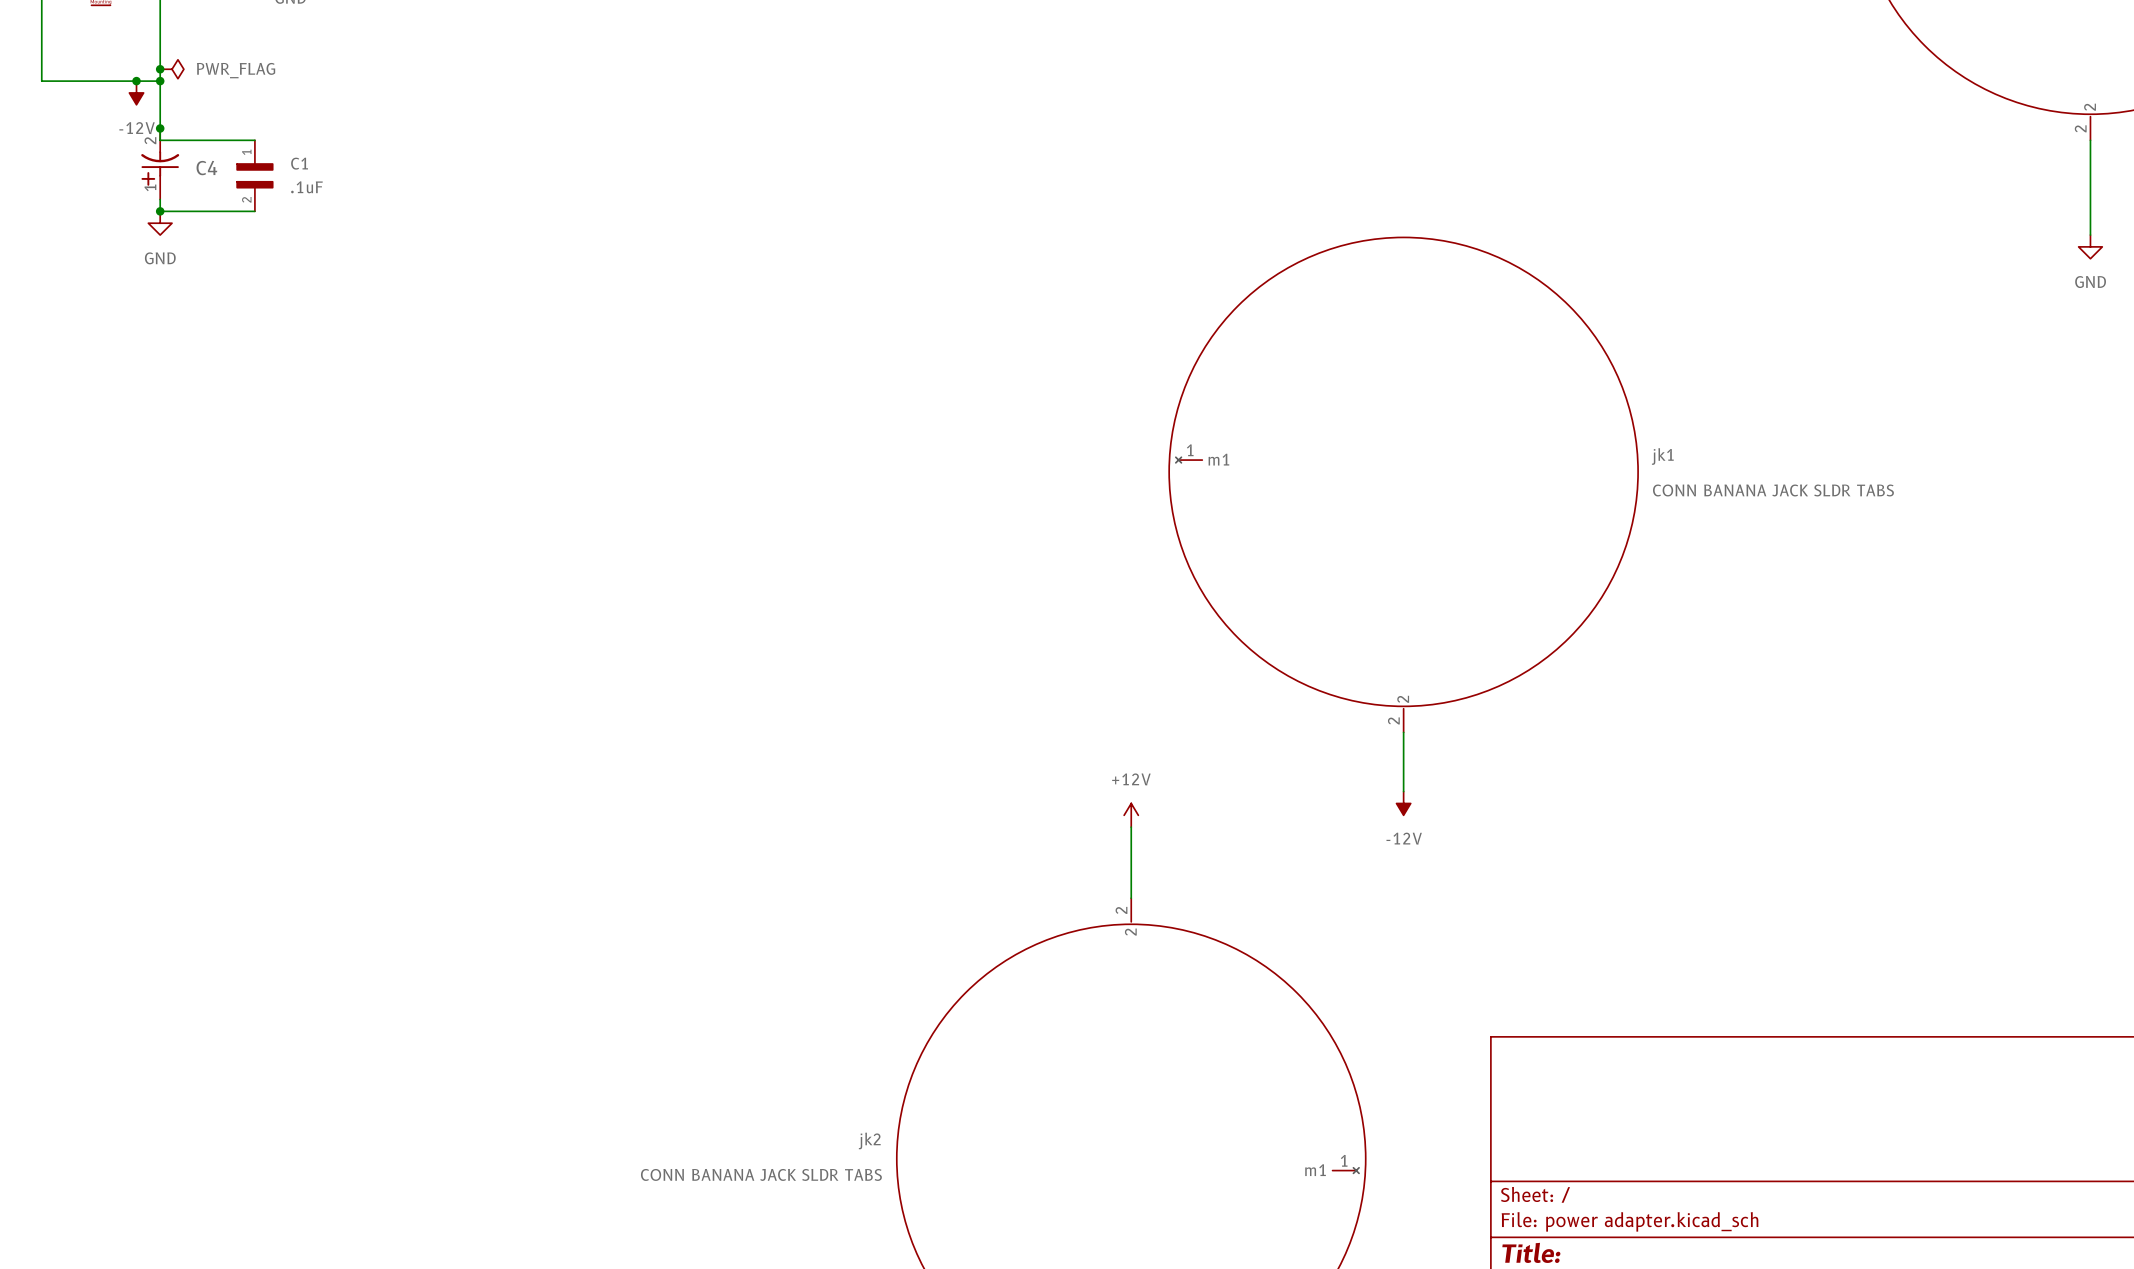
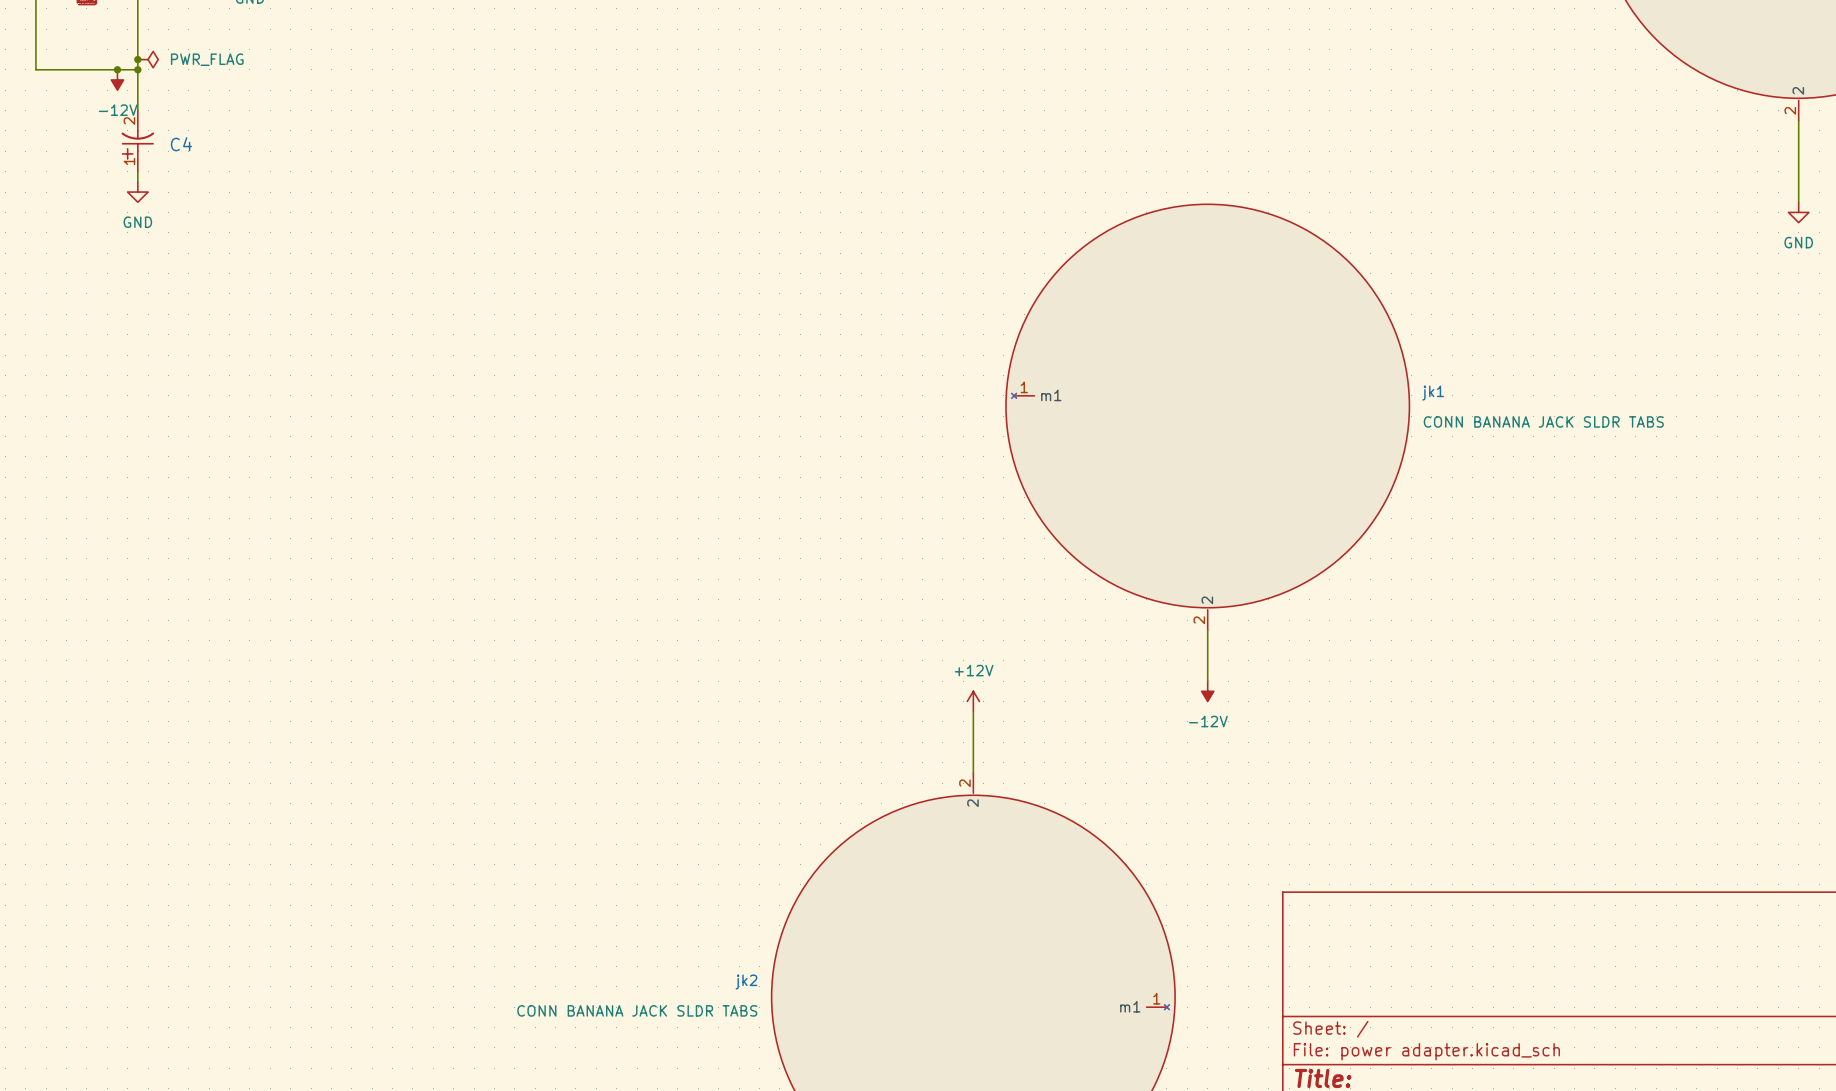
wire: (160, 128) (160, 140) (254, 140) -> none
junction: (160, 128) -> none
C1: .1uF (254, 175) -> none
wire: (160, 211) (254, 211) -> none
junction: (160, 211) -> none

